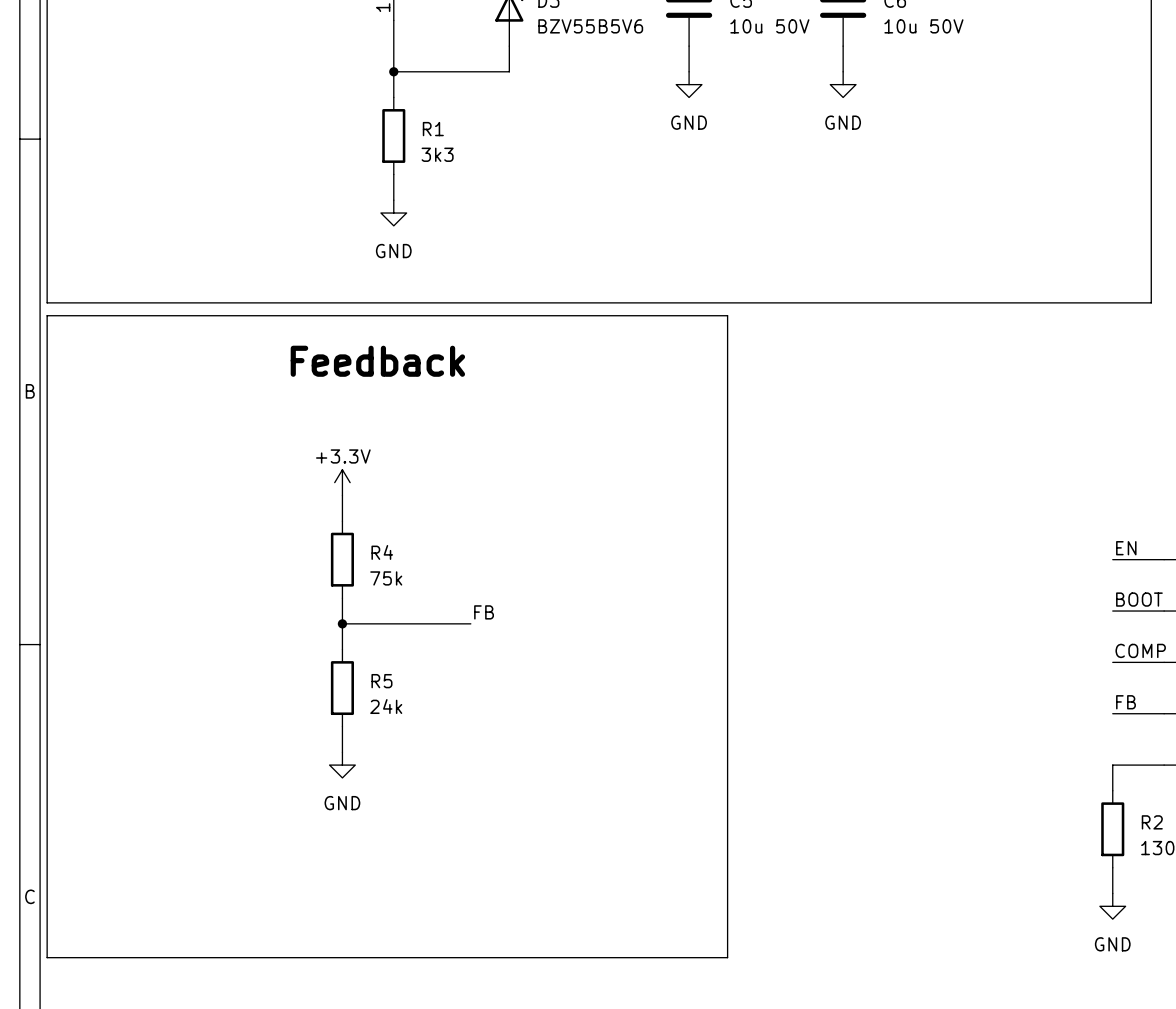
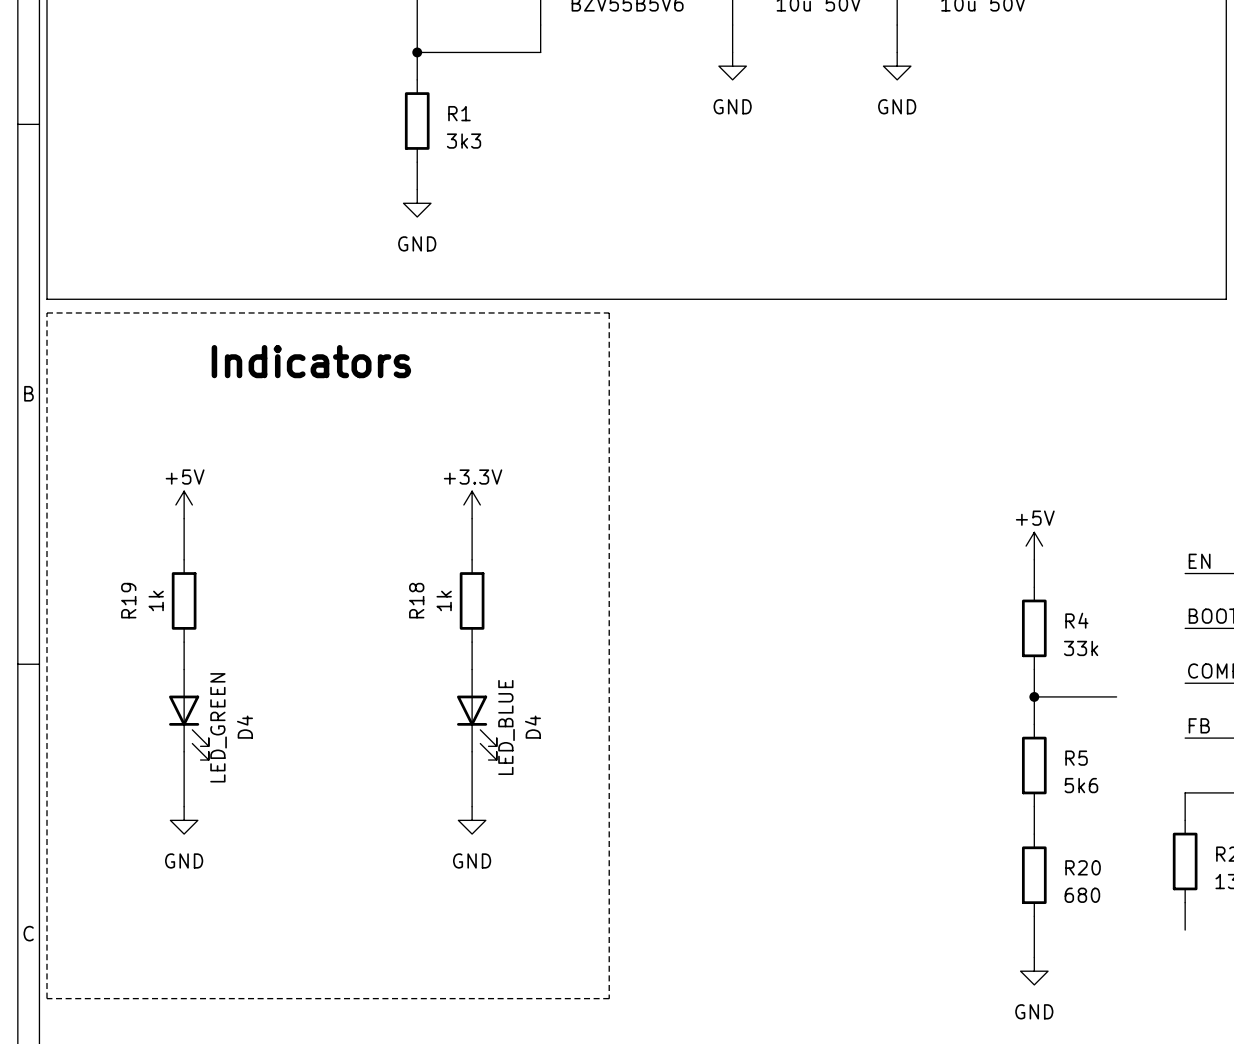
line: (47, 315) (727, 315) (727, 957) (47, 957) (47, 315) -> (47, 312) (47, 998) (609, 998) (609, 312) (47, 312)
text: none -> Indicators (311, 361)
text: Feedback (377, 361) -> none
power symbol position: +3.3V (342, 482) -> +3.3V (472, 504)
power symbol: none -> +5V (184, 504)
wire: (342, 495) (342, 521) -> (472, 642) (472, 669)
wire: none -> (184, 518) (184, 559)
wire: none -> (472, 518) (472, 559)
power symbol: none -> +5V (1034, 546)
wire: none -> (1034, 559) (1034, 587)
R4 position: (342, 559) -> (1034, 628)
R4 value: 75k (386, 578) -> 33k (1081, 648)
R19: none -> 1k (184, 600)
R18: none -> 1k (472, 600)
wire: (342, 598) (342, 649) -> (472, 751) (472, 806)
label: FB (484, 612) -> none
wire: (342, 623) (470, 623) -> none
junction: (342, 623) -> none
wire: none -> (1034, 669) (1034, 724)
wire: none -> (1034, 696) (1116, 696)
junction: none -> (1034, 696)
R5 position: (342, 688) -> (1034, 765)
D4: none -> LED_GREEN (188, 714)
D4: none -> LED_BLUE (476, 714)
R5 value: 24k (386, 706) -> 5k6 (1081, 785)
wire: none -> (184, 751) (184, 806)
wire: (342, 726) (342, 752) -> (184, 642) (184, 669)
power symbol: GND (342, 765) -> none
wire: none -> (1034, 806) (1034, 834)
power symbol: none -> GND (184, 820)
power symbol: none -> GND (472, 820)
R20: none -> 680 (1034, 875)
wire: none -> (1034, 916) (1034, 957)
power symbol position: GND (1112, 906) -> GND (1034, 971)

